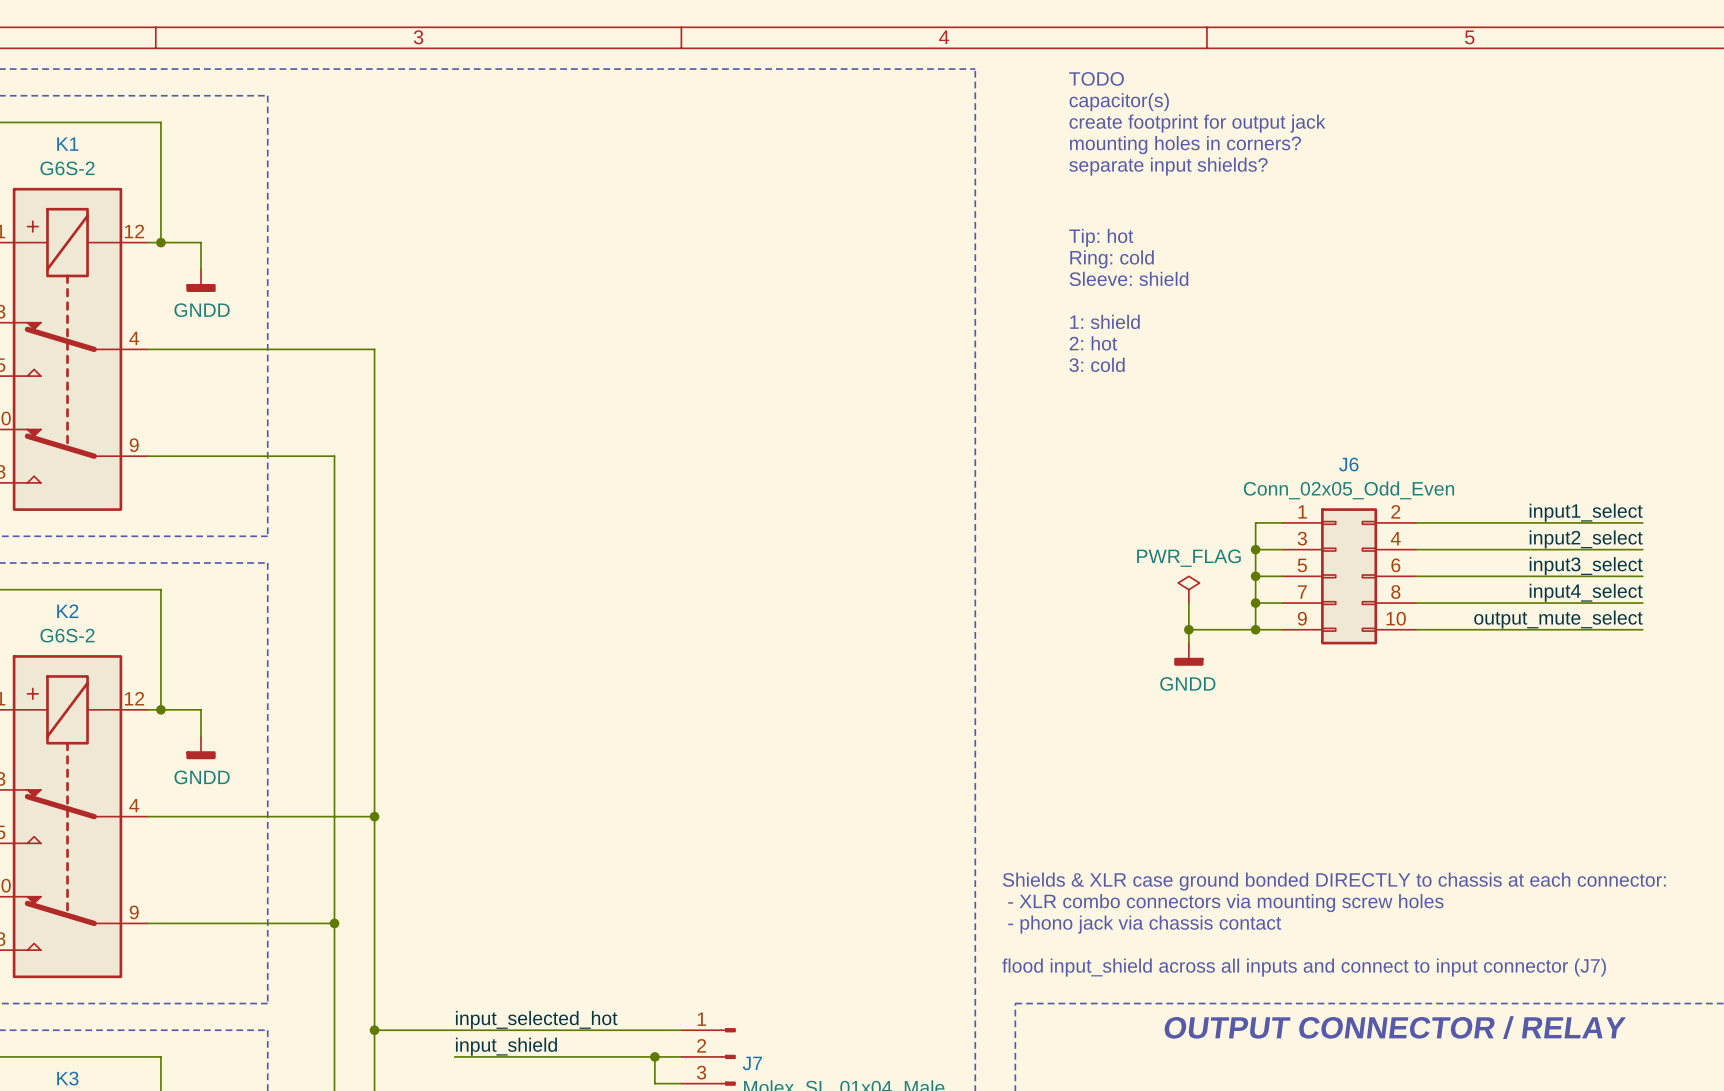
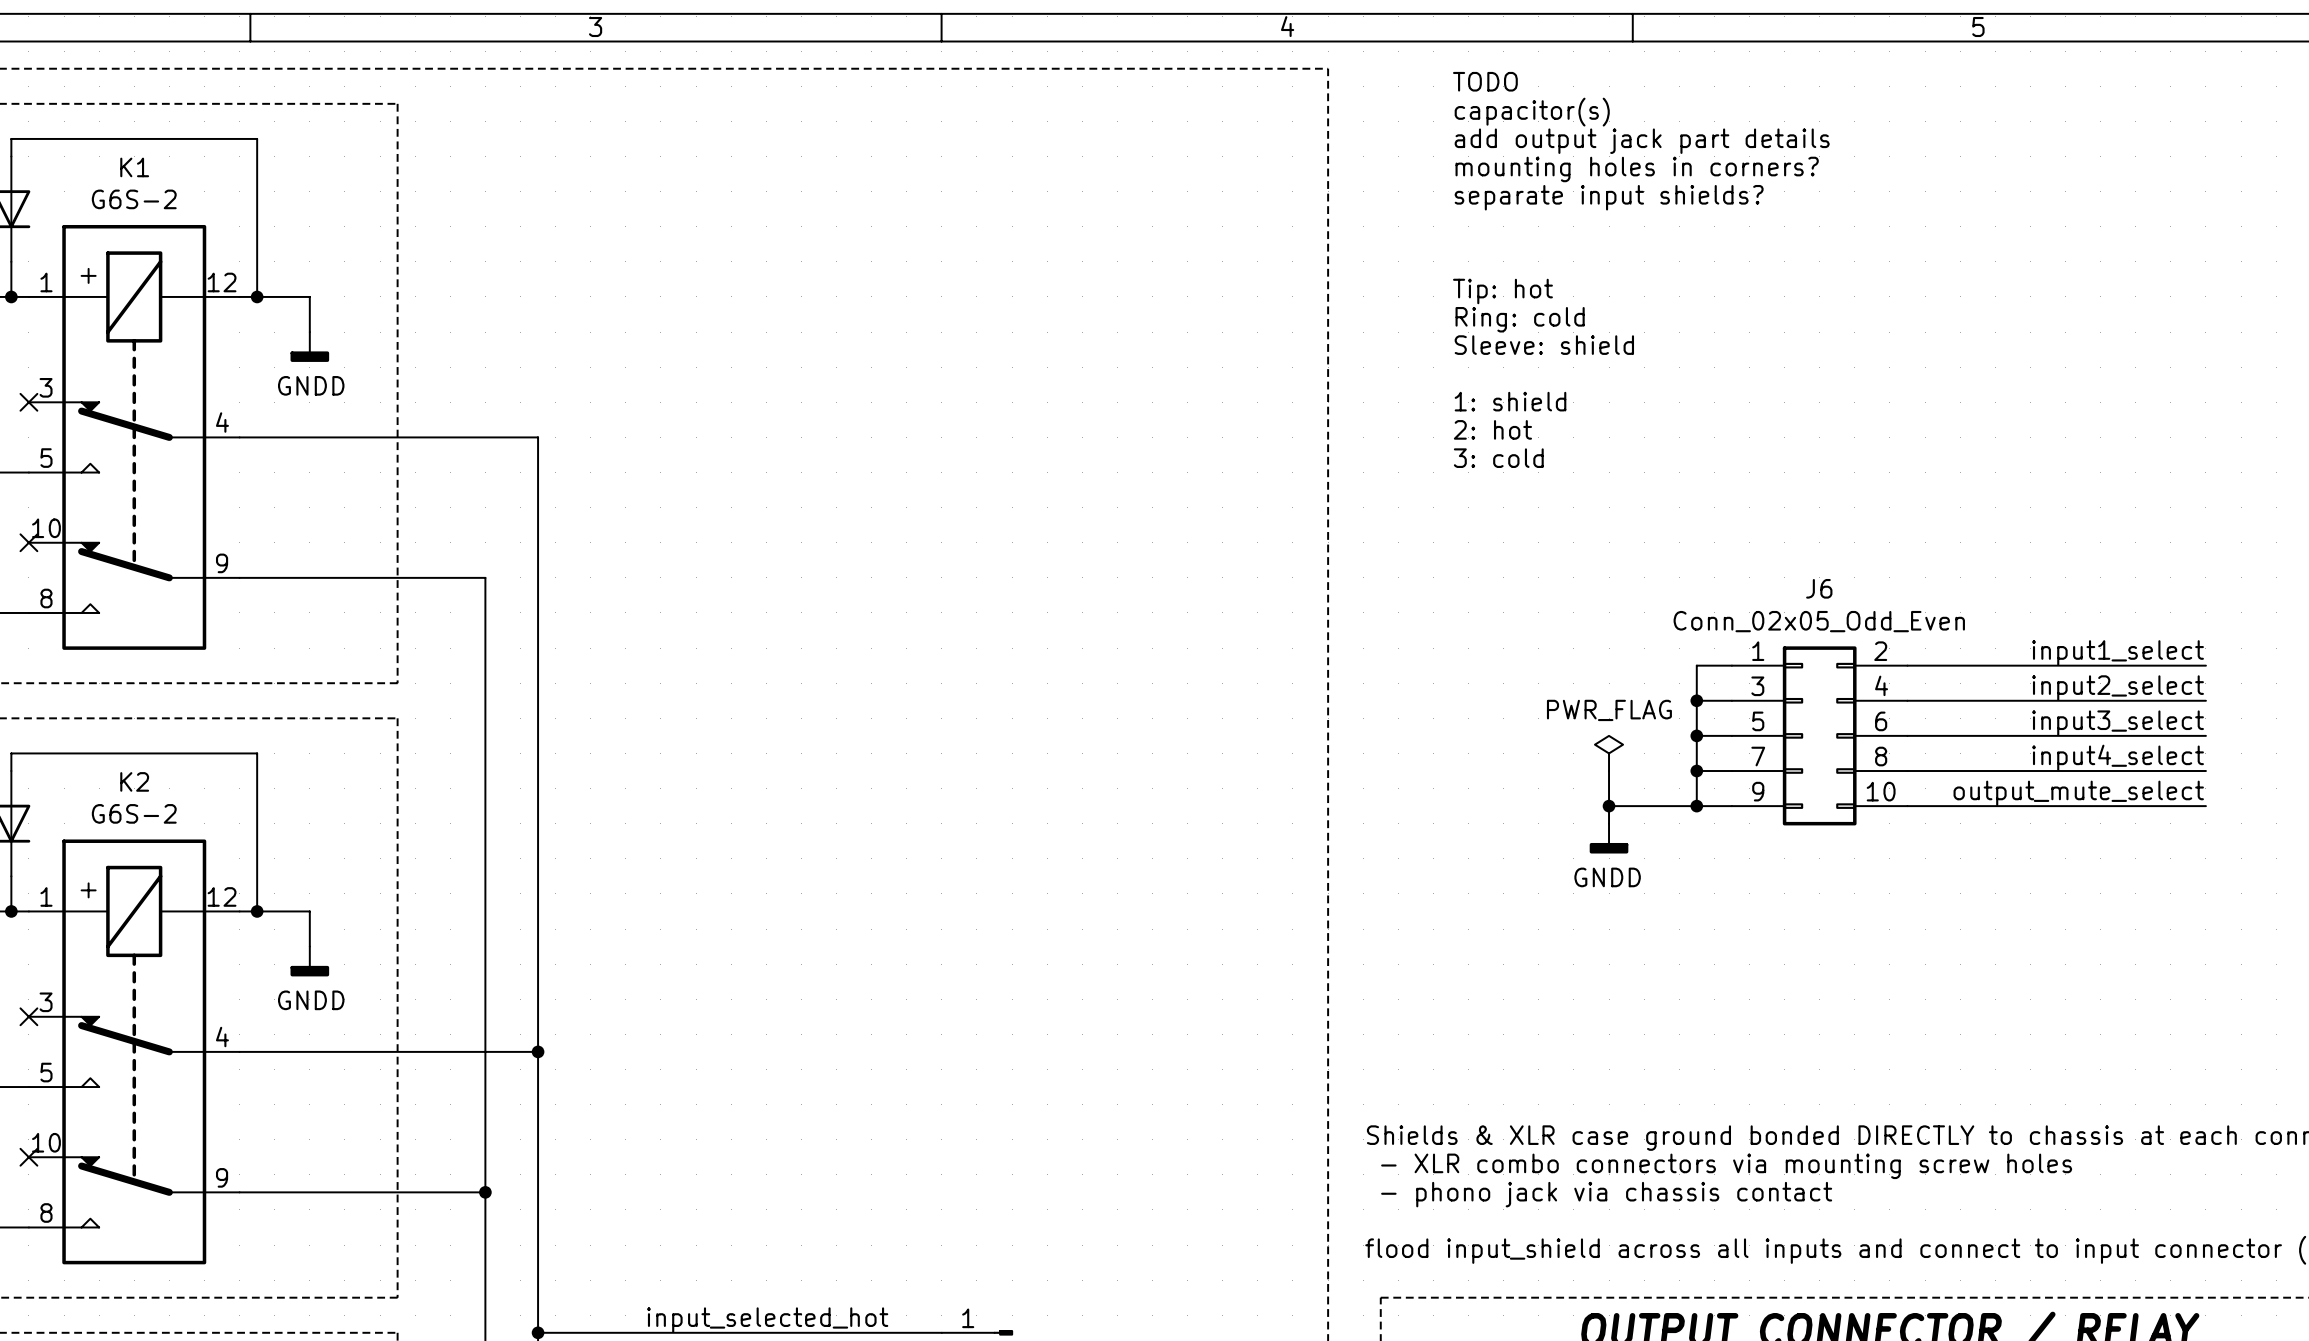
text: create footprint for output jack (1197, 123) -> add output jack part details (1642, 141)

